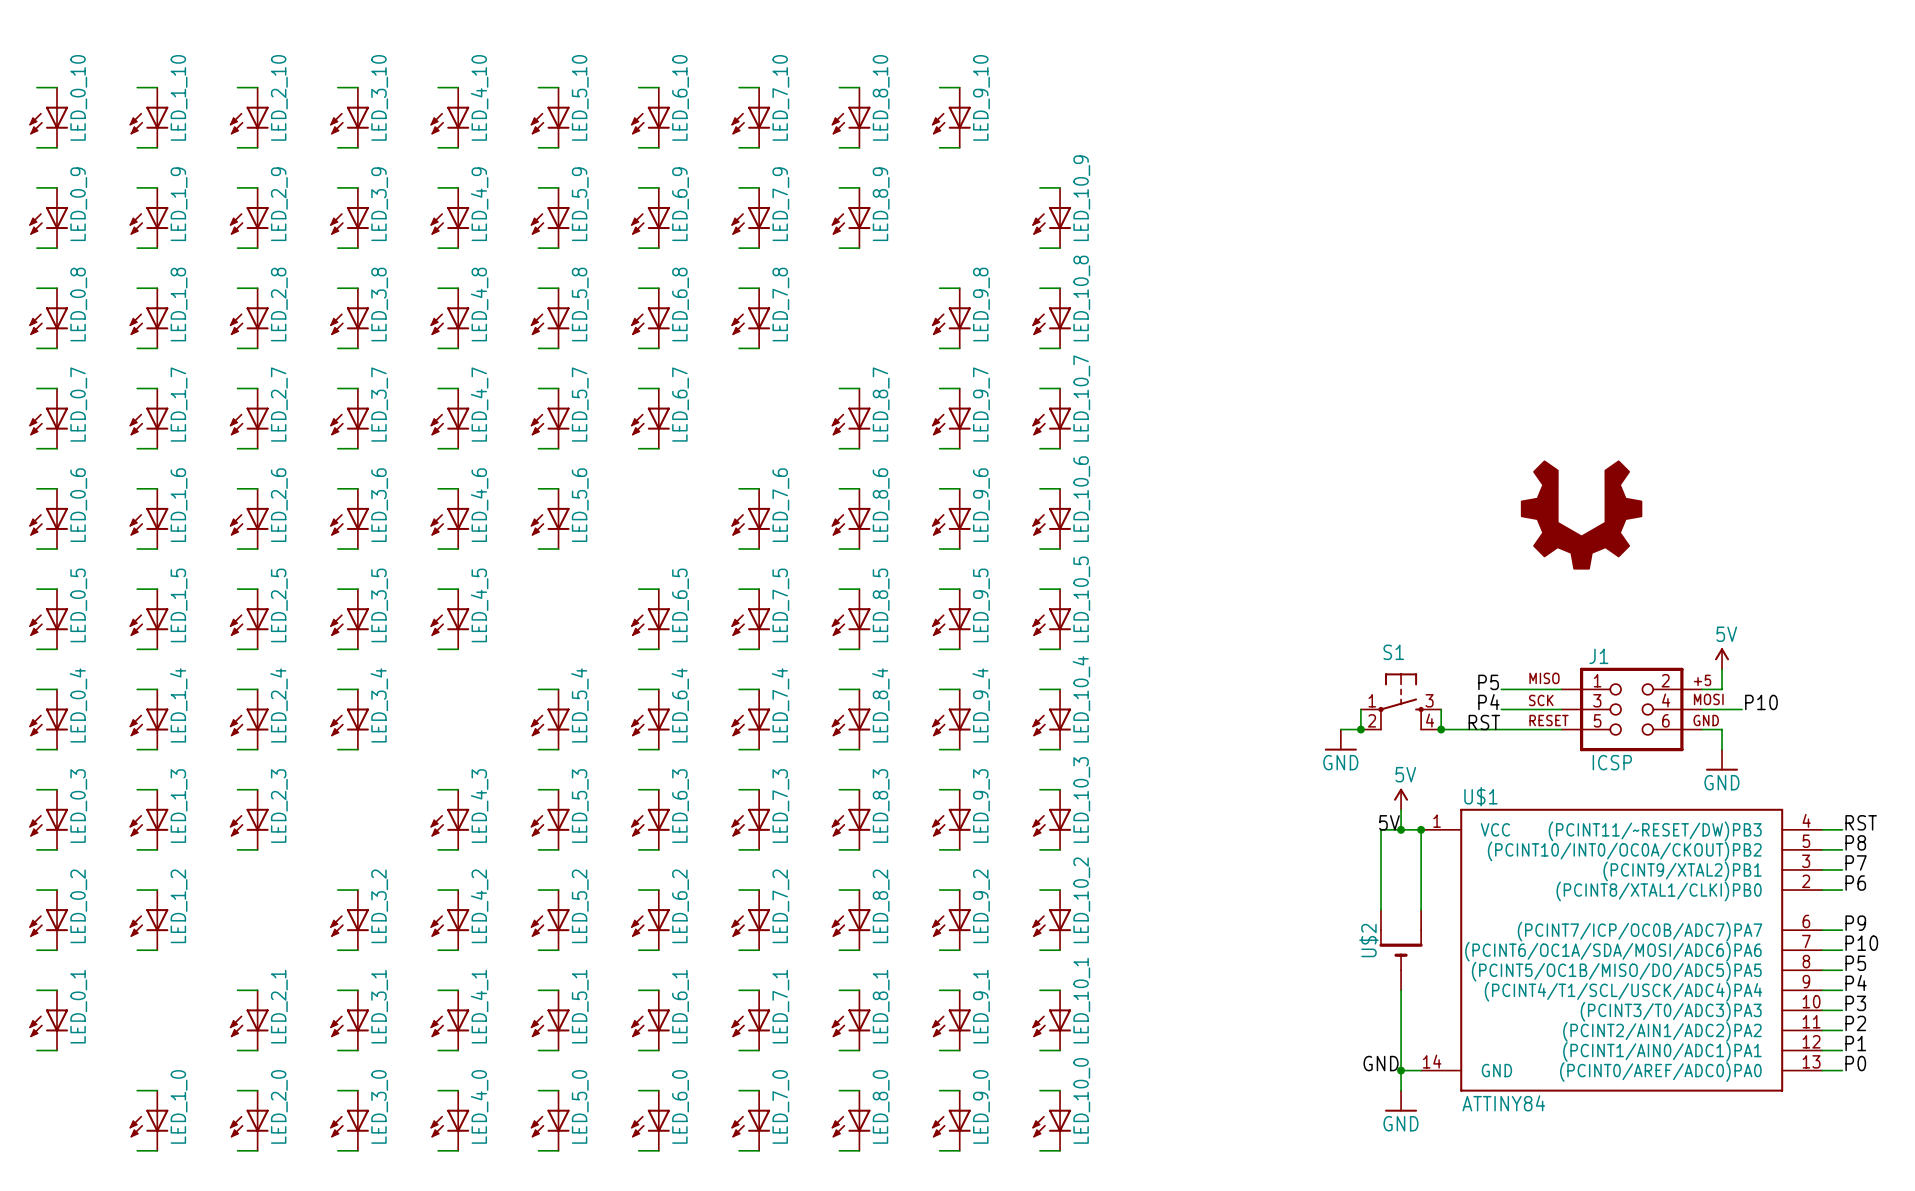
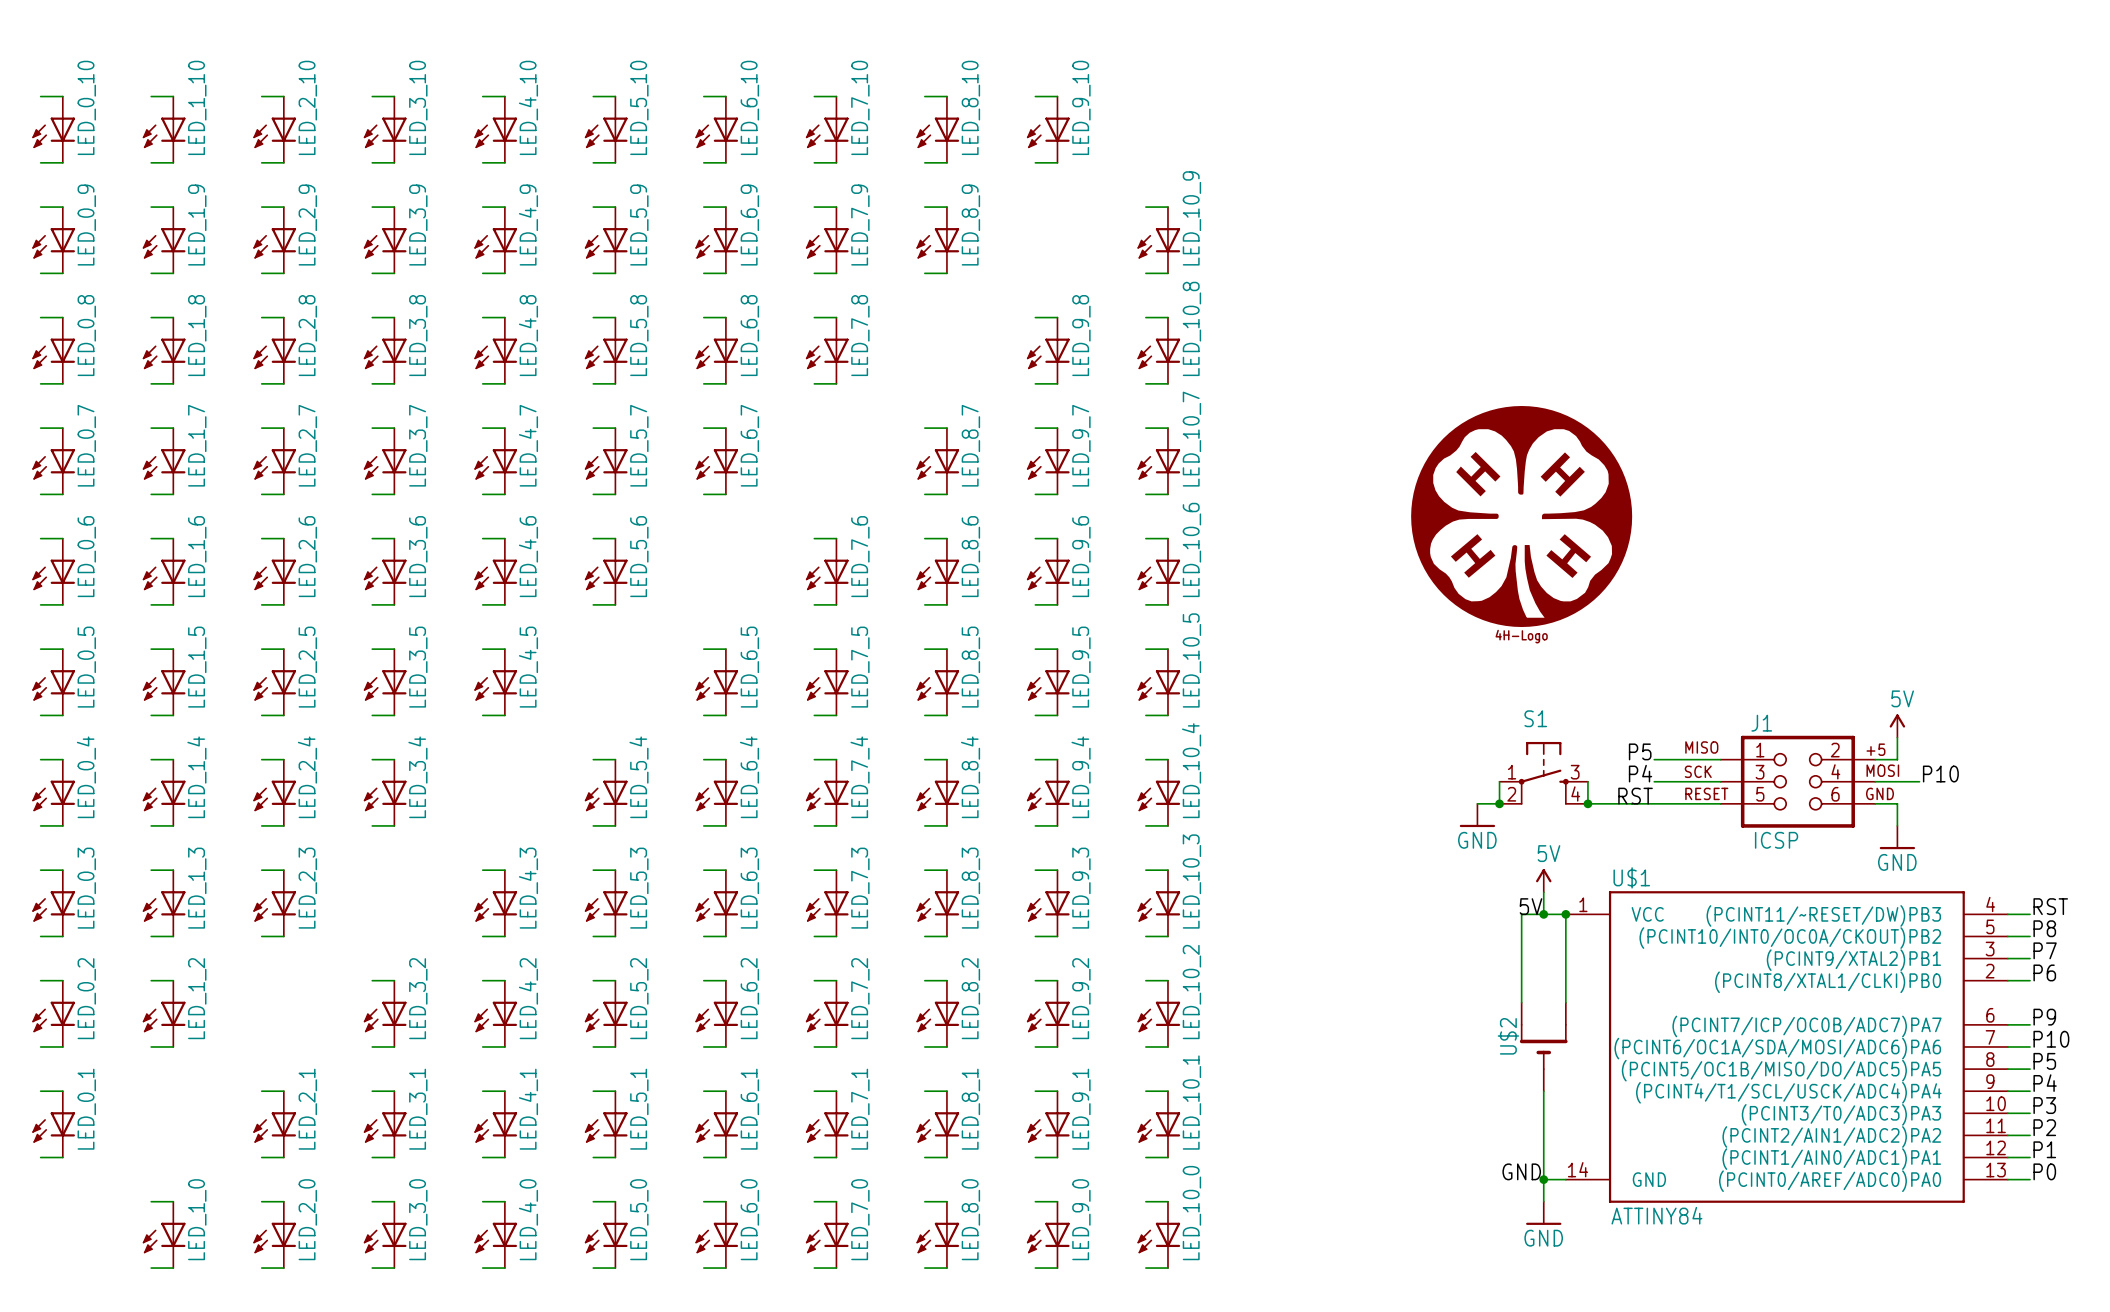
part: none -> (1521, 516)
part: (1581, 515) -> none

